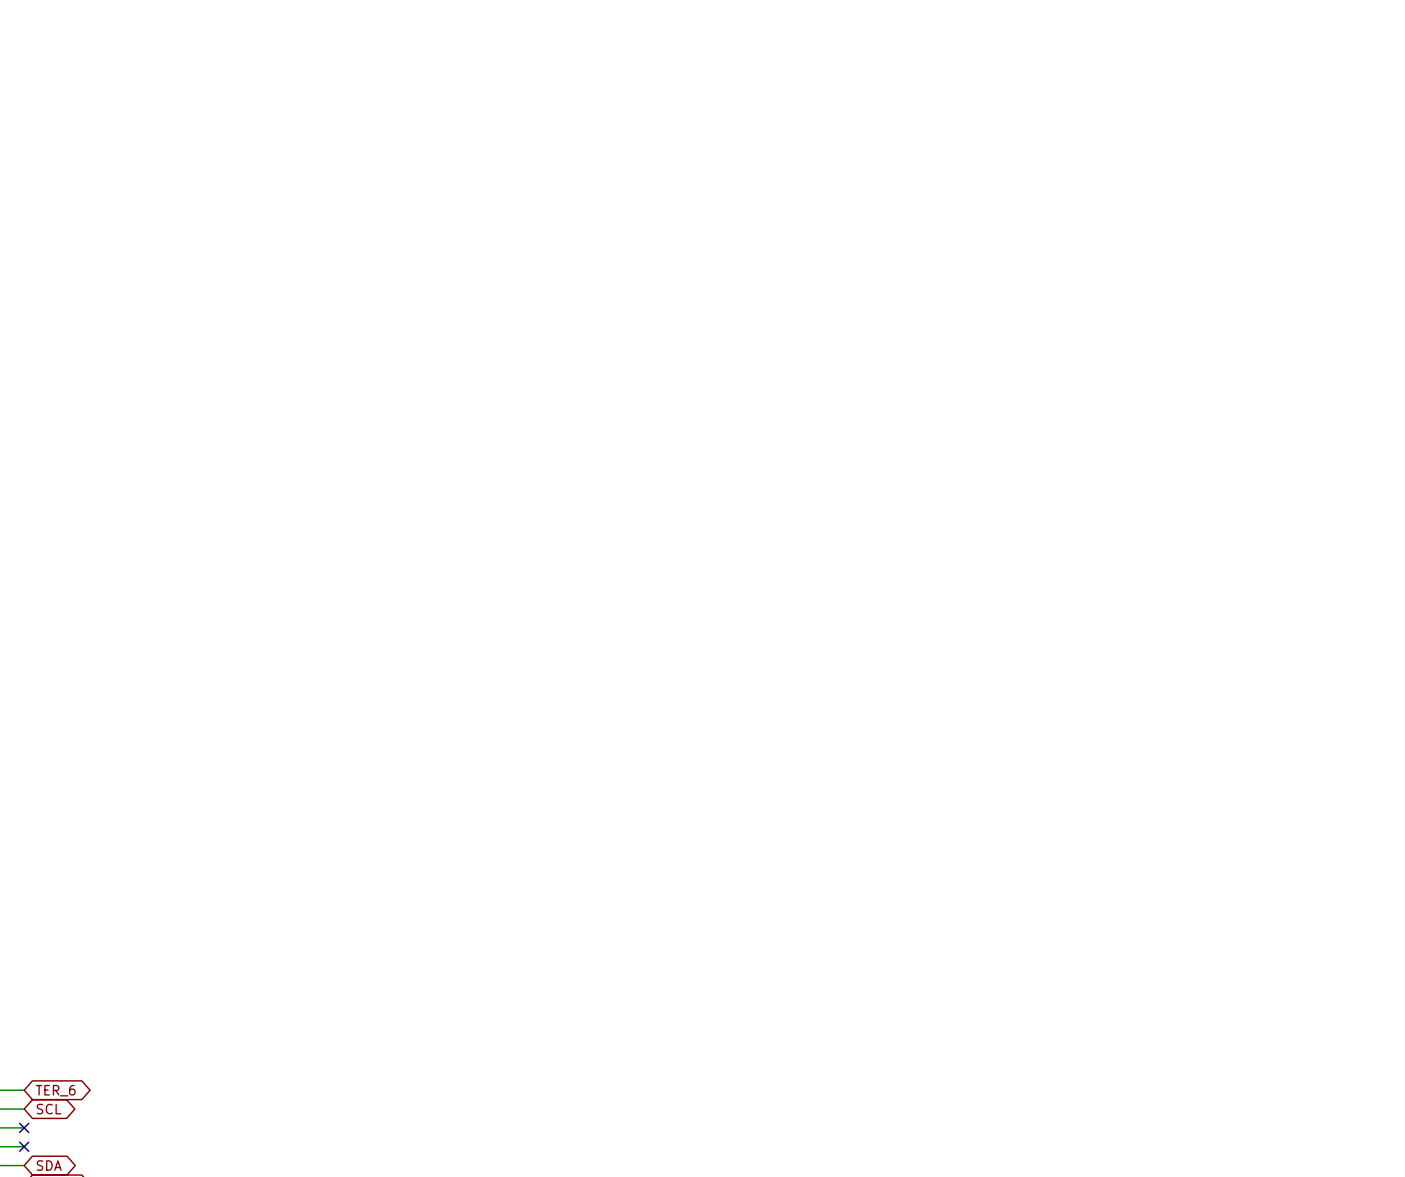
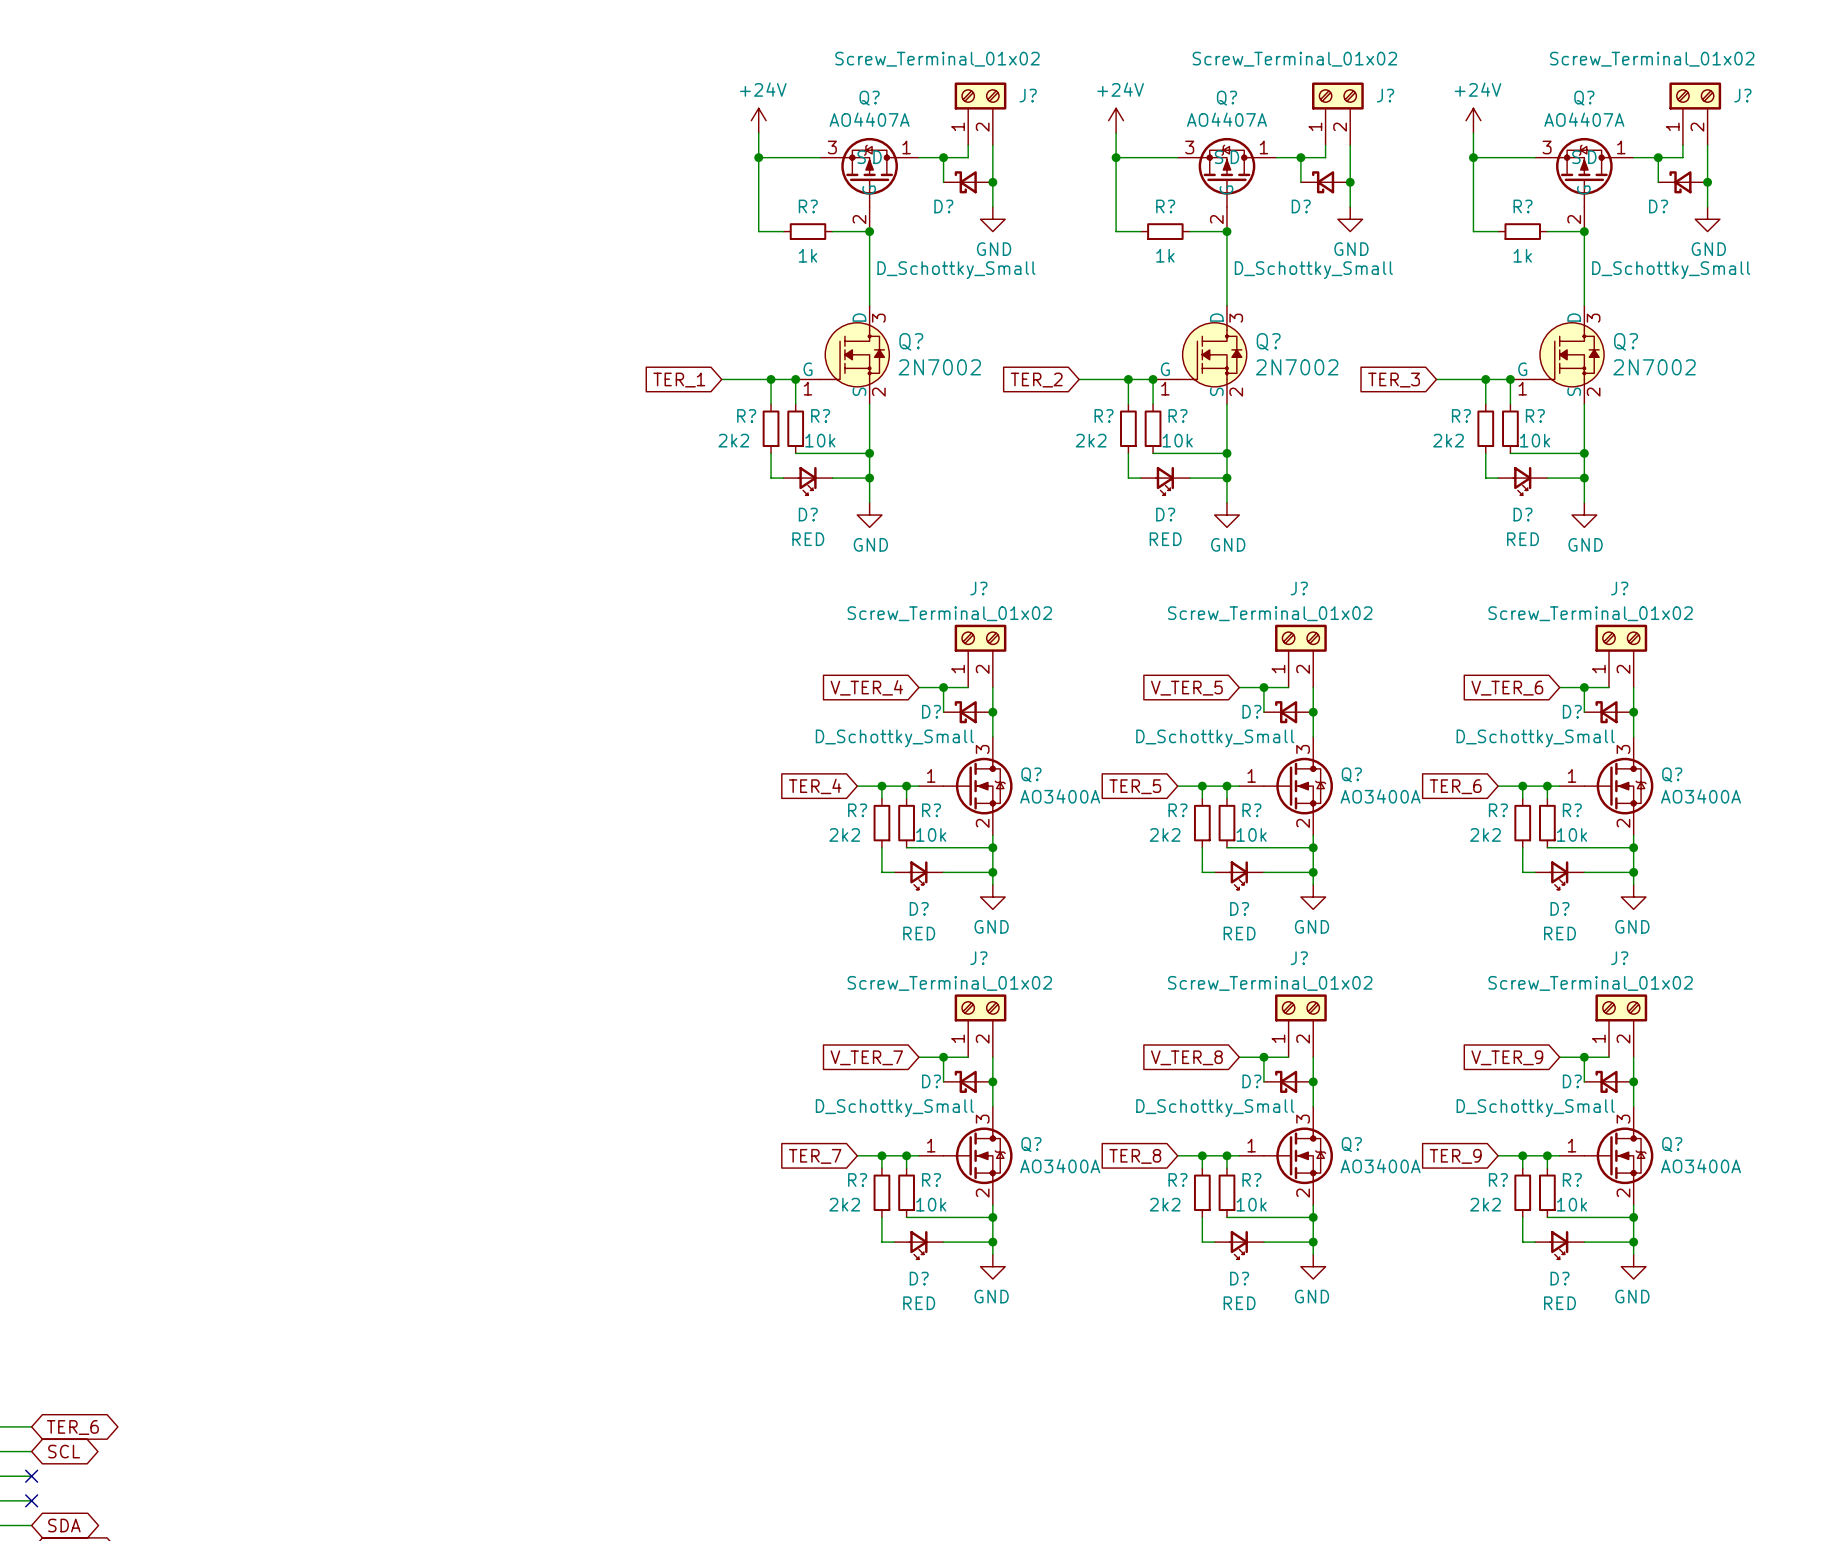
J?: none -> Screw_Terminal_01x02 (980, 113)
J?: none -> Screw_Terminal_01x02 (1337, 113)
J?: none -> Screw_Terminal_01x02 (1695, 113)
power symbol: none -> +24V (758, 120)
power symbol: none -> +24V (1116, 120)
power symbol: none -> +24V (1473, 120)
wire: none -> (758, 133) (758, 231) (783, 231)
wire: none -> (1116, 133) (1116, 231) (1140, 231)
wire: none -> (1473, 133) (1473, 231) (1498, 231)
wire: none -> (968, 145) (968, 157) (918, 157)
wire: none -> (992, 145) (992, 206)
wire: none -> (1325, 145) (1325, 157) (1276, 157)
wire: none -> (1350, 145) (1350, 206)
wire: none -> (1682, 145) (1682, 157) (1633, 157)
wire: none -> (1707, 145) (1707, 206)
wire: none -> (758, 157) (820, 157)
junction: none -> (758, 157)
wire: none -> (943, 157) (943, 182)
junction: none -> (943, 157)
wire: none -> (1116, 157) (1177, 157)
junction: none -> (1116, 157)
wire: none -> (1300, 157) (1300, 182)
junction: none -> (1300, 157)
wire: none -> (1473, 157) (1535, 157)
junction: none -> (1473, 157)
wire: none -> (1658, 157) (1658, 182)
junction: none -> (1658, 157)
D?: none -> D_Schottky_Small (968, 182)
junction: none -> (992, 182)
D?: none -> D_Schottky_Small (1325, 182)
junction: none -> (1350, 182)
D?: none -> D_Schottky_Small (1682, 182)
junction: none -> (1707, 182)
Q?: none -> AO4407A (869, 184)
Q?: none -> AO4407A (1226, 184)
Q?: none -> AO4407A (1584, 184)
power symbol: none -> GND (992, 219)
power symbol: none -> GND (1350, 219)
power symbol: none -> GND (1707, 219)
R?: none -> 1k (808, 231)
wire: none -> (832, 231) (869, 231) (869, 305)
junction: none -> (869, 231)
R?: none -> 1k (1165, 231)
wire: none -> (1190, 231) (1226, 231) (1226, 305)
junction: none -> (1226, 231)
R?: none -> 1k (1522, 231)
wire: none -> (1547, 231) (1584, 231) (1584, 305)
junction: none -> (1584, 231)
Q?: none -> 2N7002 (842, 354)
Q?: none -> 2N7002 (1199, 354)
Q?: none -> 2N7002 (1557, 354)
wire: none -> (721, 379) (795, 379) (795, 404)
wire: none -> (771, 379) (771, 404)
junction: none -> (771, 379)
junction: none -> (795, 379)
wire: none -> (1079, 379) (1153, 379) (1153, 404)
wire: none -> (1128, 379) (1128, 404)
junction: none -> (1128, 379)
junction: none -> (1153, 379)
wire: none -> (1436, 379) (1510, 379) (1510, 404)
wire: none -> (1485, 379) (1485, 404)
junction: none -> (1485, 379)
junction: none -> (1510, 379)
global label: none -> TER_1 (679, 380)
global label: none -> TER_2 (1036, 380)
global label: none -> TER_3 (1394, 380)
wire: none -> (869, 404) (869, 502)
wire: none -> (1226, 404) (1226, 502)
wire: none -> (1584, 404) (1584, 502)
R?: none -> 2k2 (771, 428)
R?: none -> 10k (795, 428)
R?: none -> 2k2 (1128, 428)
R?: none -> 10k (1153, 428)
R?: none -> 2k2 (1485, 428)
R?: none -> 10k (1510, 428)
wire: none -> (771, 453) (771, 478) (783, 478)
wire: none -> (795, 453) (869, 453)
junction: none -> (869, 453)
wire: none -> (1128, 453) (1128, 478) (1140, 478)
wire: none -> (1153, 453) (1226, 453)
junction: none -> (1226, 453)
wire: none -> (1485, 453) (1485, 478) (1498, 478)
wire: none -> (1510, 453) (1584, 453)
junction: none -> (1584, 453)
wire: none -> (832, 478) (869, 478)
junction: none -> (869, 478)
wire: none -> (1190, 478) (1226, 478)
junction: none -> (1226, 478)
wire: none -> (1547, 478) (1584, 478)
junction: none -> (1584, 478)
D?: none -> RED (808, 481)
D?: none -> RED (1165, 481)
D?: none -> RED (1522, 481)
power symbol: none -> GND (869, 515)
power symbol: none -> GND (1226, 515)
power symbol: none -> GND (1584, 515)
J?: none -> Screw_Terminal_01x02 (980, 656)
J?: none -> Screw_Terminal_01x02 (1300, 656)
J?: none -> Screw_Terminal_01x02 (1621, 656)
global label: none -> V_TER_4 (866, 687)
wire: none -> (918, 687) (968, 687)
wire: none -> (943, 687) (943, 712)
junction: none -> (943, 687)
wire: none -> (992, 687) (992, 736)
global label: none -> V_TER_5 (1186, 688)
wire: none -> (1239, 687) (1288, 687)
wire: none -> (1263, 687) (1263, 712)
junction: none -> (1263, 687)
wire: none -> (1313, 687) (1313, 736)
global label: none -> V_TER_6 (1507, 688)
wire: none -> (1559, 687) (1609, 687)
wire: none -> (1584, 687) (1584, 712)
junction: none -> (1584, 687)
wire: none -> (1633, 687) (1633, 736)
D?: none -> D_Schottky_Small (968, 712)
junction: none -> (992, 712)
D?: none -> D_Schottky_Small (1288, 712)
junction: none -> (1313, 712)
D?: none -> D_Schottky_Small (1609, 712)
junction: none -> (1633, 712)
global label: none -> TER_4 (815, 786)
wire: none -> (857, 786) (918, 786)
wire: none -> (881, 786) (881, 798)
junction: none -> (881, 786)
wire: none -> (906, 786) (906, 798)
junction: none -> (906, 786)
Q?: none -> AO3400A (965, 786)
wire: none -> (1177, 786) (1239, 786)
wire: none -> (1202, 786) (1202, 798)
junction: none -> (1202, 786)
wire: none -> (1226, 786) (1226, 798)
junction: none -> (1226, 786)
Q?: none -> AO3400A (1286, 786)
wire: none -> (1498, 786) (1559, 786)
wire: none -> (1522, 786) (1522, 798)
junction: none -> (1522, 786)
wire: none -> (1547, 786) (1547, 798)
junction: none -> (1547, 786)
Q?: none -> AO3400A (1606, 786)
global label: none -> TER_5 (1135, 786)
global label: none -> TER_6 (1455, 786)
R?: none -> 2k2 (881, 823)
R?: none -> 10k (906, 823)
R?: none -> 2k2 (1202, 823)
R?: none -> 10k (1226, 823)
R?: none -> 2k2 (1522, 823)
R?: none -> 10k (1547, 823)
wire: none -> (992, 835) (992, 884)
wire: none -> (1313, 835) (1313, 884)
wire: none -> (1633, 835) (1633, 884)
wire: none -> (881, 847) (881, 872) (894, 872)
wire: none -> (906, 847) (992, 847)
junction: none -> (992, 847)
wire: none -> (1202, 847) (1202, 872) (1214, 872)
wire: none -> (1226, 847) (1313, 847)
junction: none -> (1313, 847)
wire: none -> (1522, 847) (1522, 872) (1535, 872)
wire: none -> (1547, 847) (1633, 847)
junction: none -> (1633, 847)
wire: none -> (943, 872) (992, 872)
junction: none -> (992, 872)
wire: none -> (1263, 872) (1313, 872)
junction: none -> (1313, 872)
wire: none -> (1584, 872) (1633, 872)
junction: none -> (1633, 872)
D?: none -> RED (918, 875)
D?: none -> RED (1239, 875)
D?: none -> RED (1559, 875)
power symbol: none -> GND (992, 897)
power symbol: none -> GND (1313, 897)
power symbol: none -> GND (1633, 897)
J?: none -> Screw_Terminal_01x02 (980, 1025)
J?: none -> Screw_Terminal_01x02 (1300, 1025)
J?: none -> Screw_Terminal_01x02 (1621, 1025)
wire: none -> (918, 1057) (968, 1057)
wire: none -> (943, 1057) (943, 1081)
junction: none -> (943, 1057)
wire: none -> (992, 1057) (992, 1106)
wire: none -> (1239, 1057) (1288, 1057)
wire: none -> (1263, 1057) (1263, 1081)
junction: none -> (1263, 1057)
wire: none -> (1313, 1057) (1313, 1106)
wire: none -> (1559, 1057) (1609, 1057)
wire: none -> (1584, 1057) (1584, 1081)
junction: none -> (1584, 1057)
wire: none -> (1633, 1057) (1633, 1106)
global label: none -> V_TER_7 (866, 1057)
global label: none -> V_TER_8 (1186, 1057)
global label: none -> V_TER_9 (1507, 1057)
D?: none -> D_Schottky_Small (968, 1081)
junction: none -> (992, 1081)
D?: none -> D_Schottky_Small (1288, 1081)
junction: none -> (1313, 1081)
D?: none -> D_Schottky_Small (1609, 1081)
junction: none -> (1633, 1081)
global label: none -> TER_7 (815, 1156)
wire: none -> (857, 1155) (918, 1155)
wire: none -> (881, 1155) (881, 1168)
junction: none -> (881, 1155)
wire: none -> (906, 1155) (906, 1168)
junction: none -> (906, 1155)
Q?: none -> AO3400A (965, 1155)
global label: none -> TER_8 (1135, 1156)
wire: none -> (1177, 1155) (1239, 1155)
wire: none -> (1202, 1155) (1202, 1168)
junction: none -> (1202, 1155)
wire: none -> (1226, 1155) (1226, 1168)
junction: none -> (1226, 1155)
Q?: none -> AO3400A (1286, 1155)
global label: none -> TER_9 (1455, 1156)
wire: none -> (1498, 1155) (1559, 1155)
wire: none -> (1522, 1155) (1522, 1168)
junction: none -> (1522, 1155)
wire: none -> (1547, 1155) (1547, 1168)
junction: none -> (1547, 1155)
Q?: none -> AO3400A (1606, 1155)
R?: none -> 2k2 (881, 1192)
R?: none -> 10k (906, 1192)
R?: none -> 2k2 (1202, 1192)
R?: none -> 10k (1226, 1192)
R?: none -> 2k2 (1522, 1192)
R?: none -> 10k (1547, 1192)
wire: none -> (992, 1205) (992, 1254)
wire: none -> (1313, 1205) (1313, 1254)
wire: none -> (1633, 1205) (1633, 1254)
wire: none -> (881, 1217) (881, 1242) (894, 1242)
wire: none -> (906, 1217) (992, 1217)
junction: none -> (992, 1217)
wire: none -> (1202, 1217) (1202, 1242) (1214, 1242)
wire: none -> (1226, 1217) (1313, 1217)
junction: none -> (1313, 1217)
wire: none -> (1522, 1217) (1522, 1242) (1535, 1242)
wire: none -> (1547, 1217) (1633, 1217)
junction: none -> (1633, 1217)
wire: none -> (943, 1242) (992, 1242)
junction: none -> (992, 1242)
wire: none -> (1263, 1242) (1313, 1242)
junction: none -> (1313, 1242)
wire: none -> (1584, 1242) (1633, 1242)
junction: none -> (1633, 1242)
D?: none -> RED (918, 1245)
D?: none -> RED (1239, 1245)
D?: none -> RED (1559, 1245)
power symbol: none -> GND (992, 1266)
power symbol: none -> GND (1313, 1266)
power symbol: none -> GND (1633, 1266)

